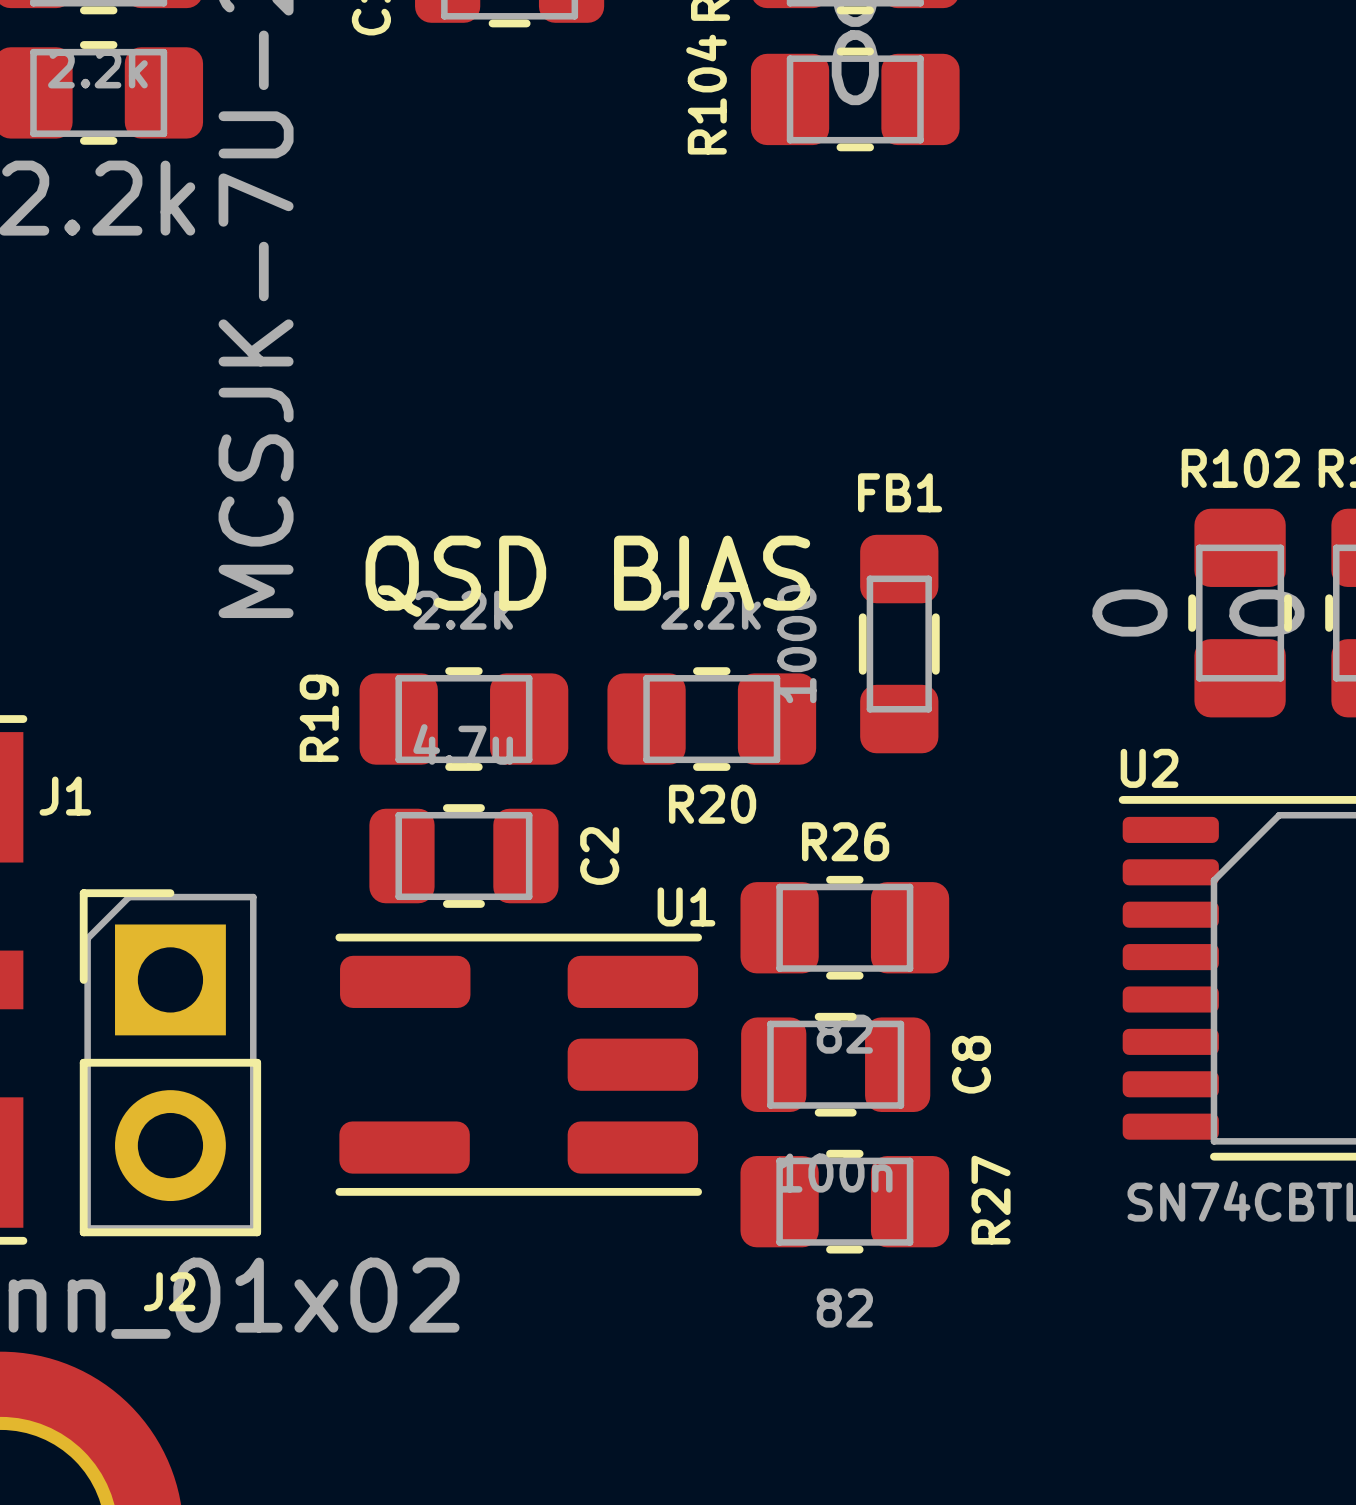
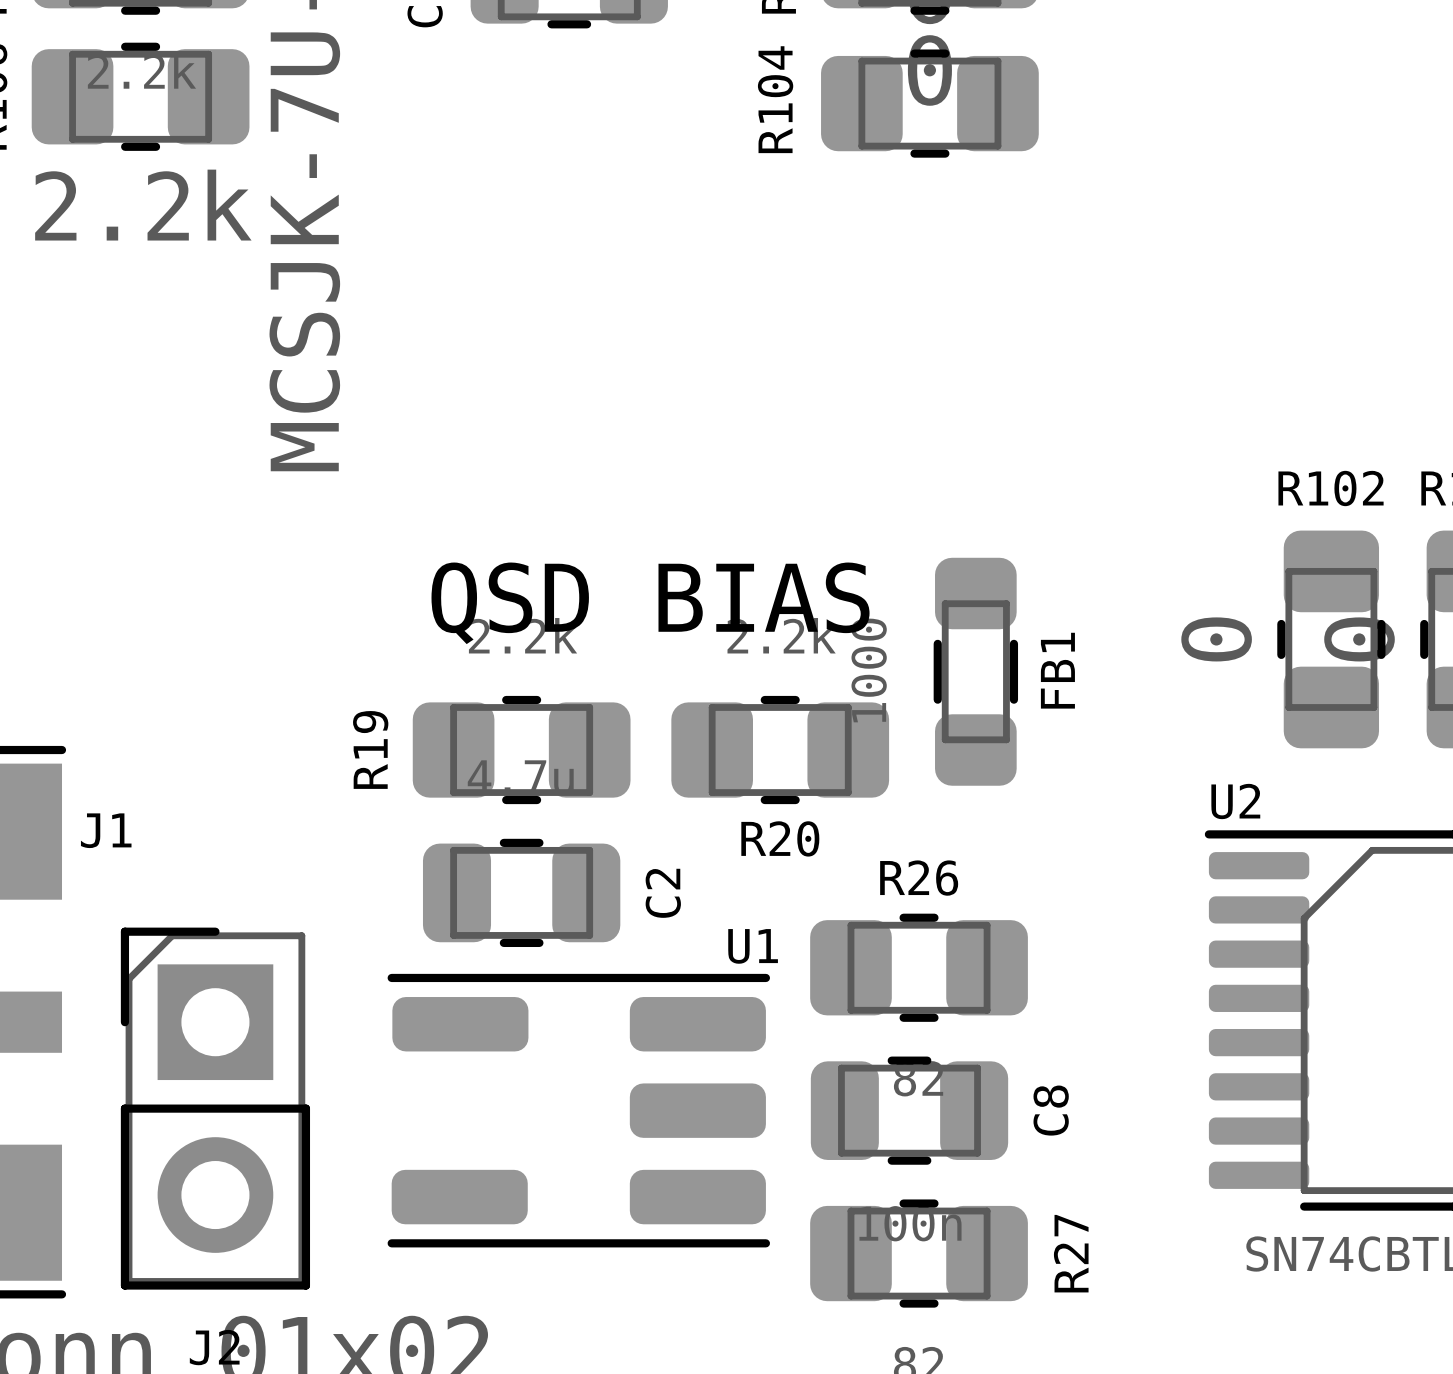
FB1 name rotation: 0° (900, 492) -> 90° counterclockwise (1057, 670)
FB1 name position: FB1 (900, 492) -> FB1 (1057, 670)

